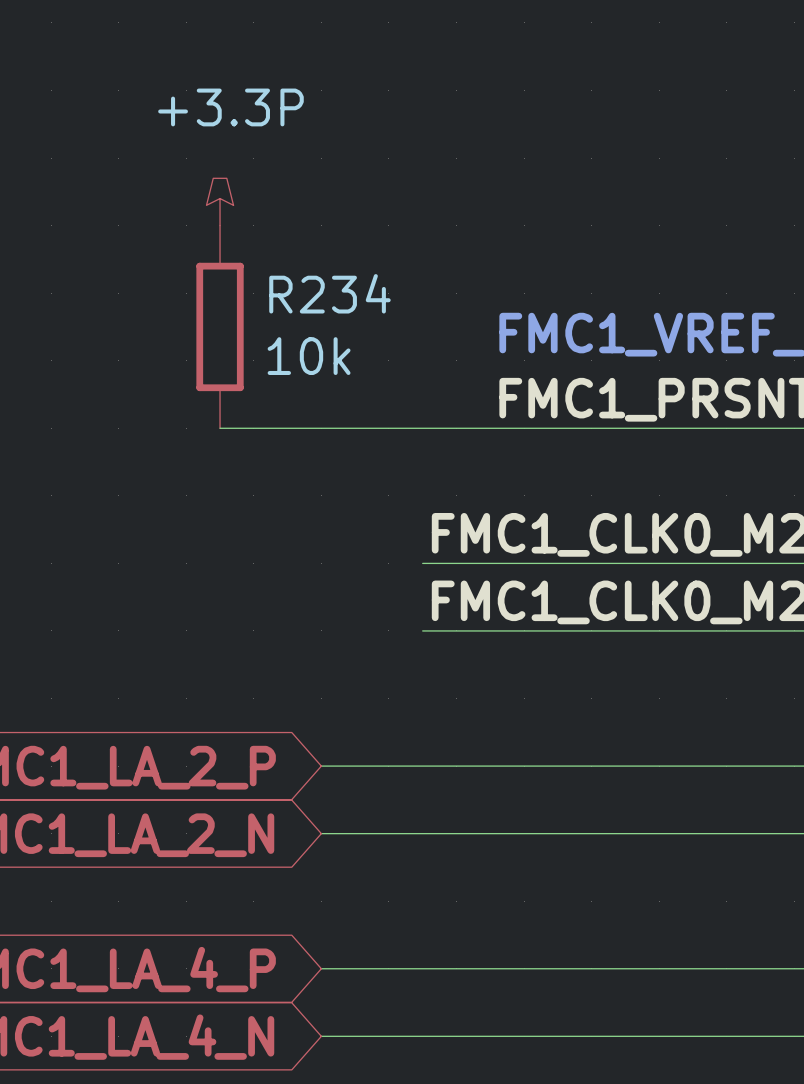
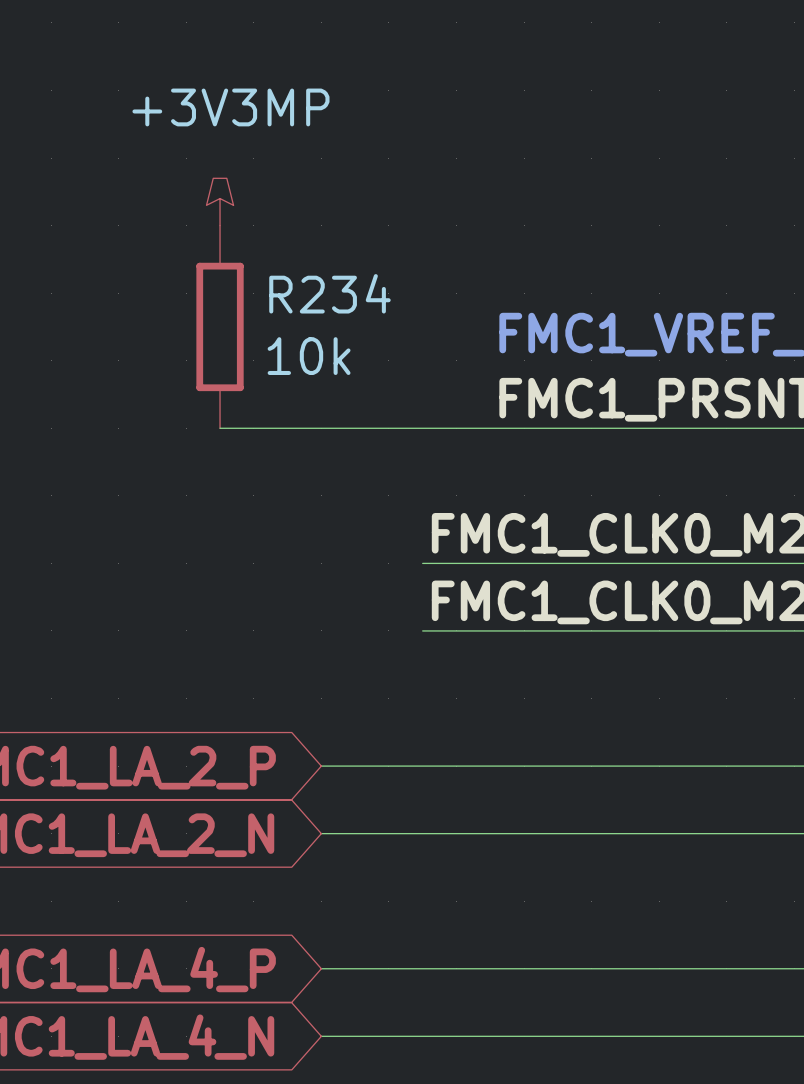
power symbol: +3.3P (220, 201) -> +3V3MP (220, 201)

